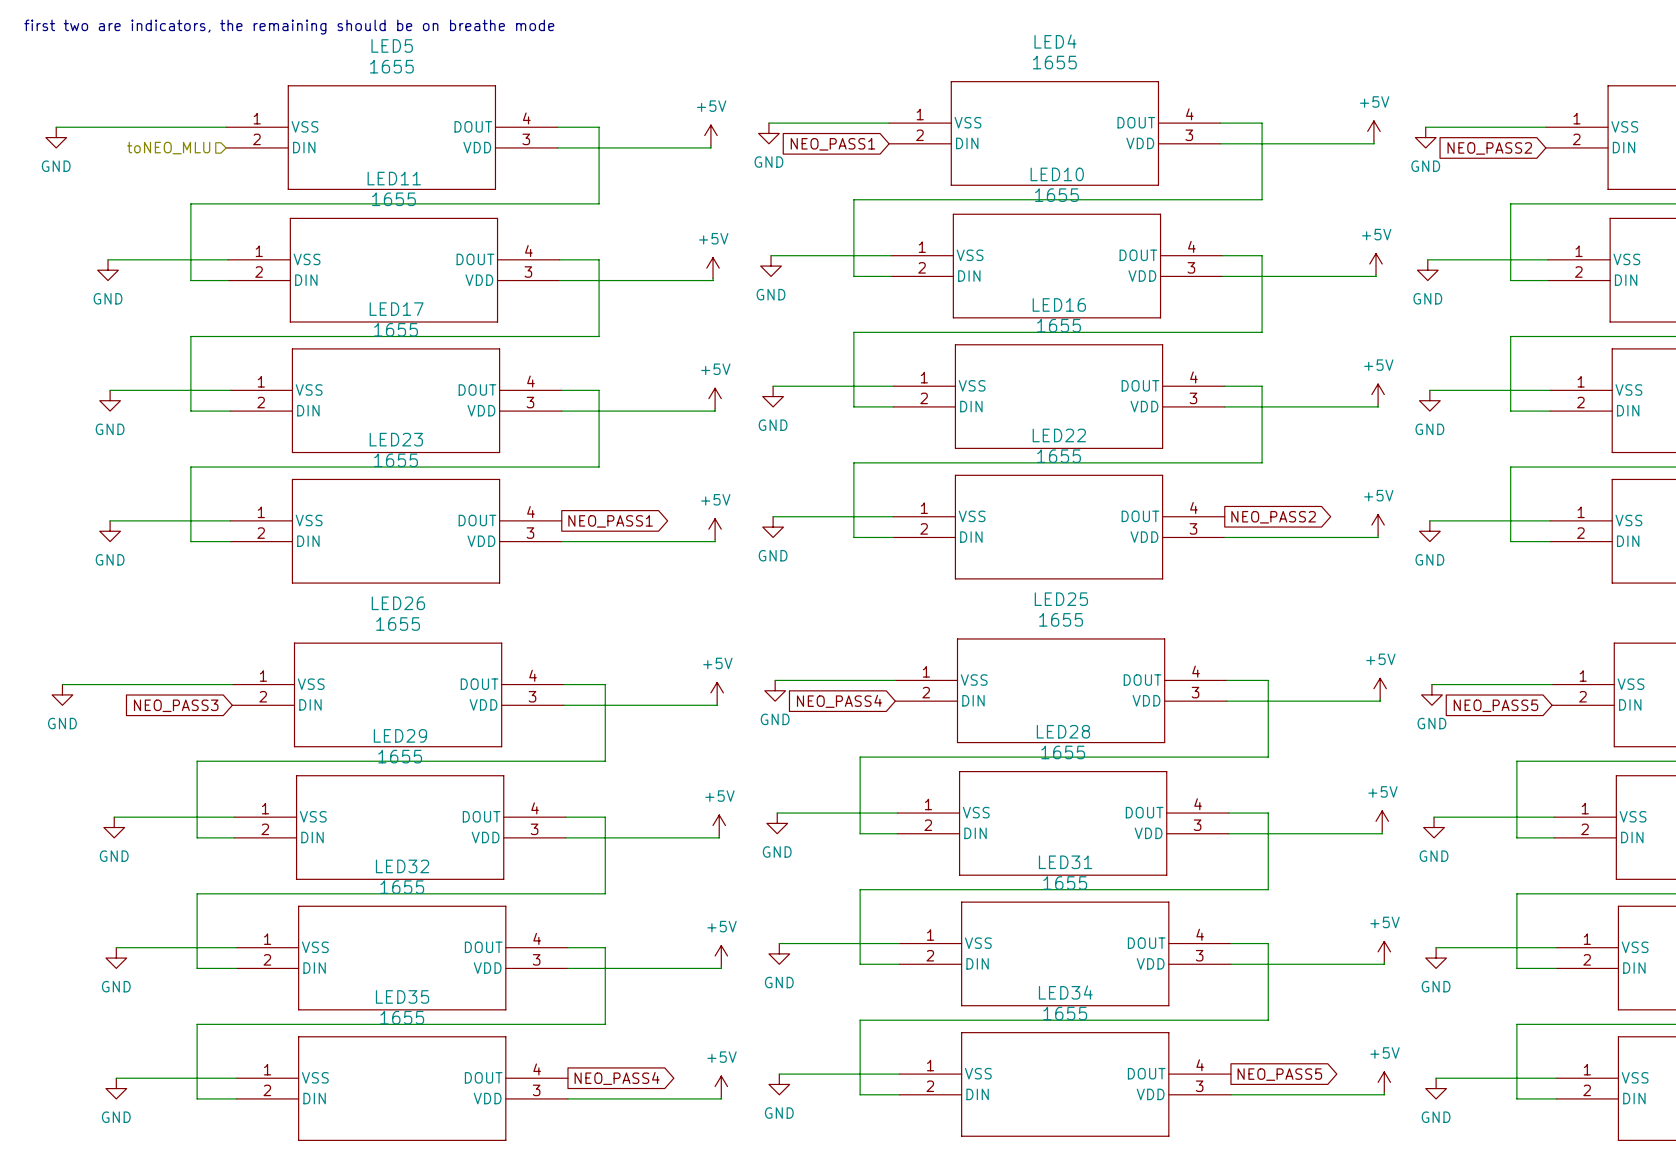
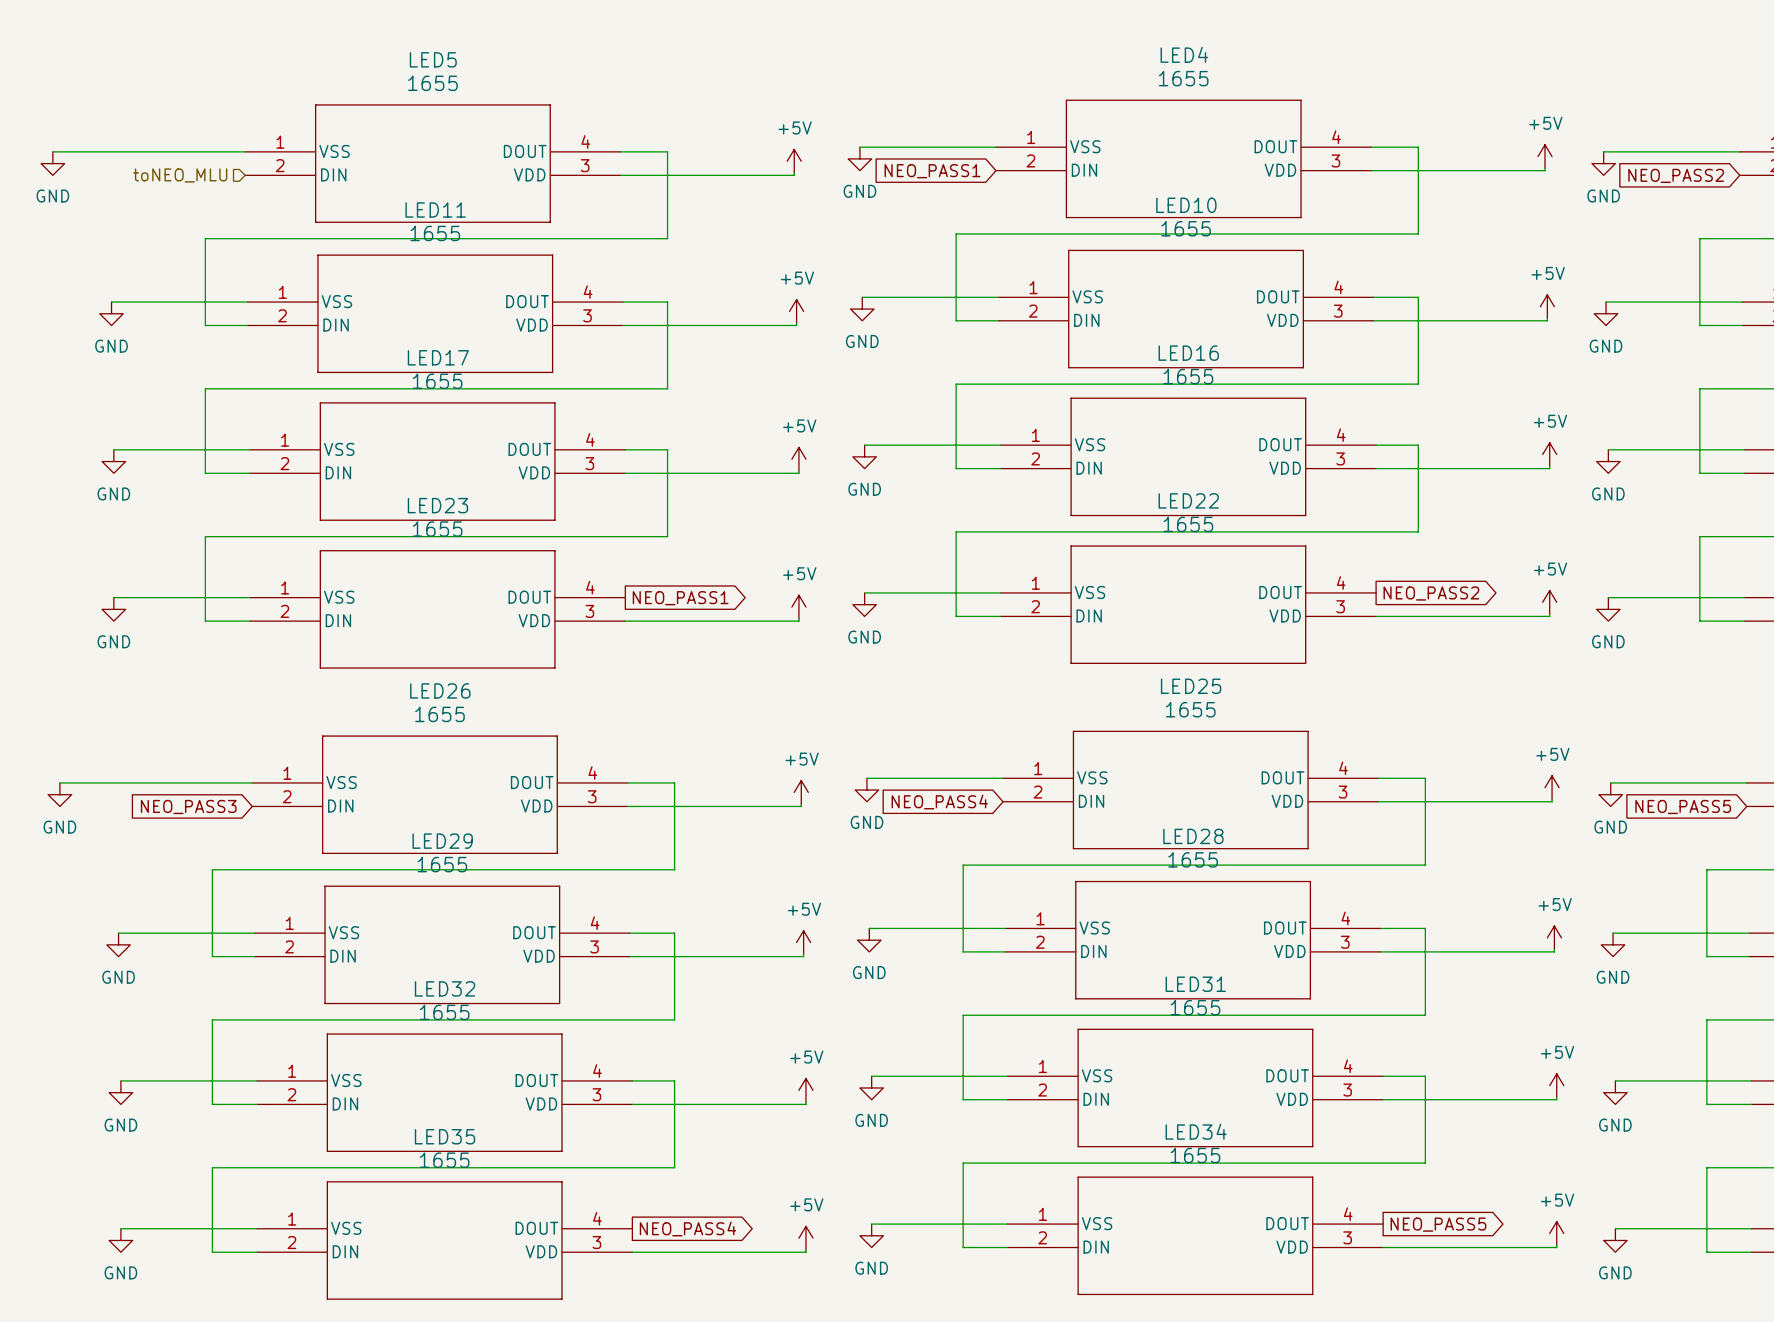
text: first two are indicators, the remaining should be on breathe mode (289, 27) -> none

